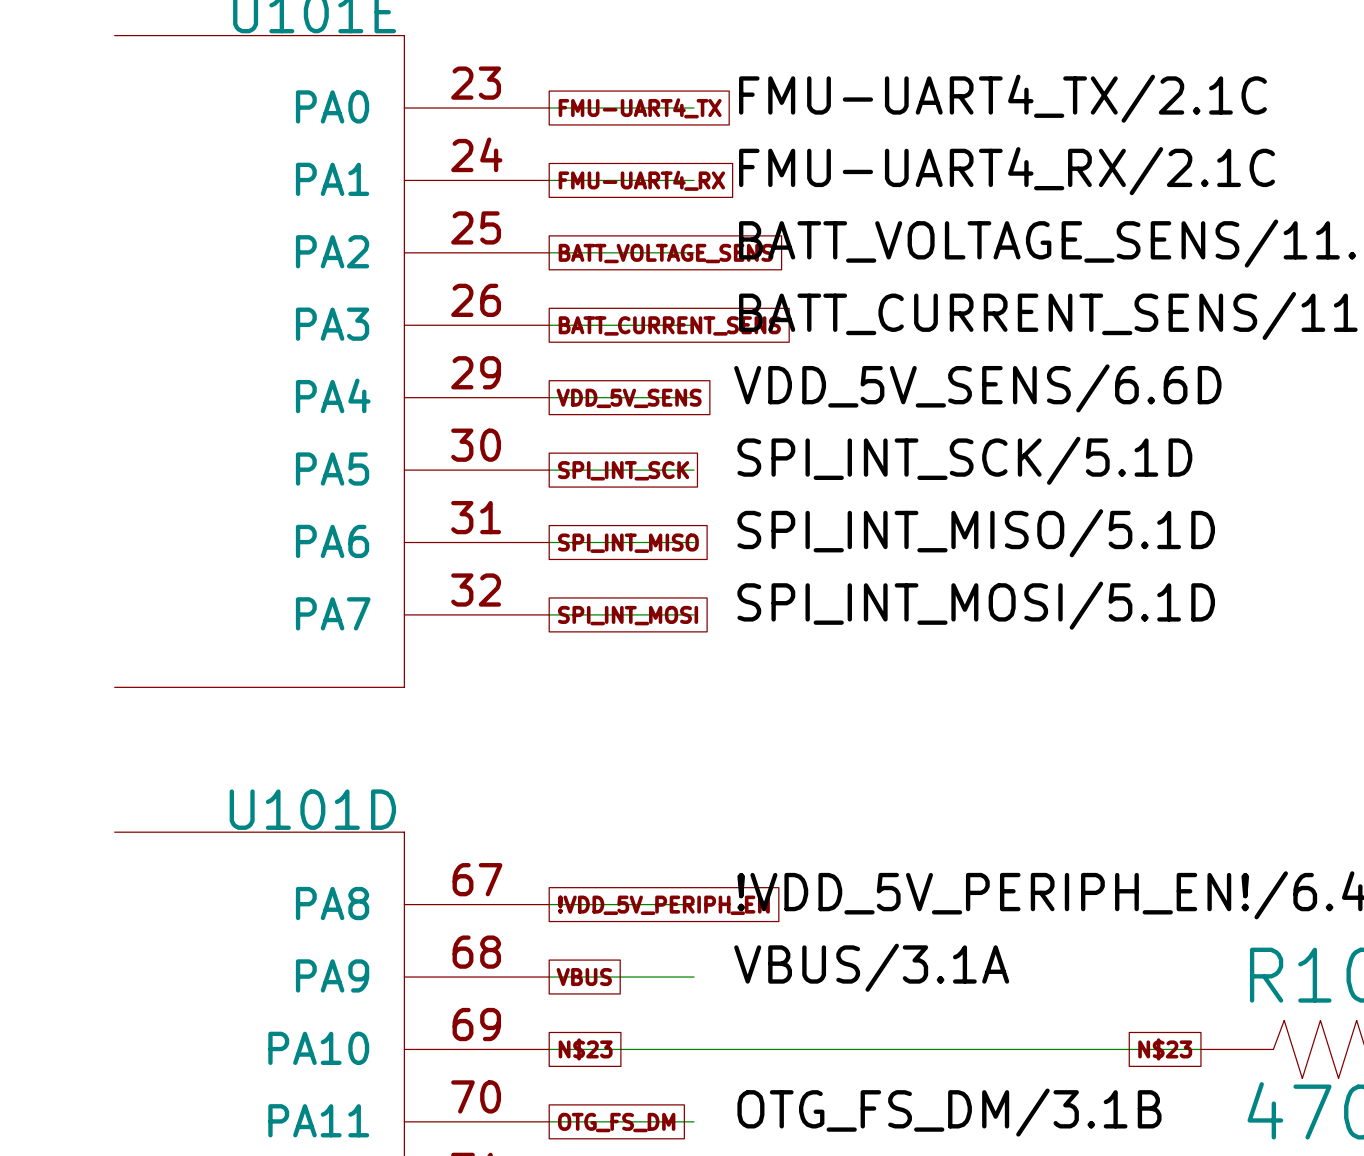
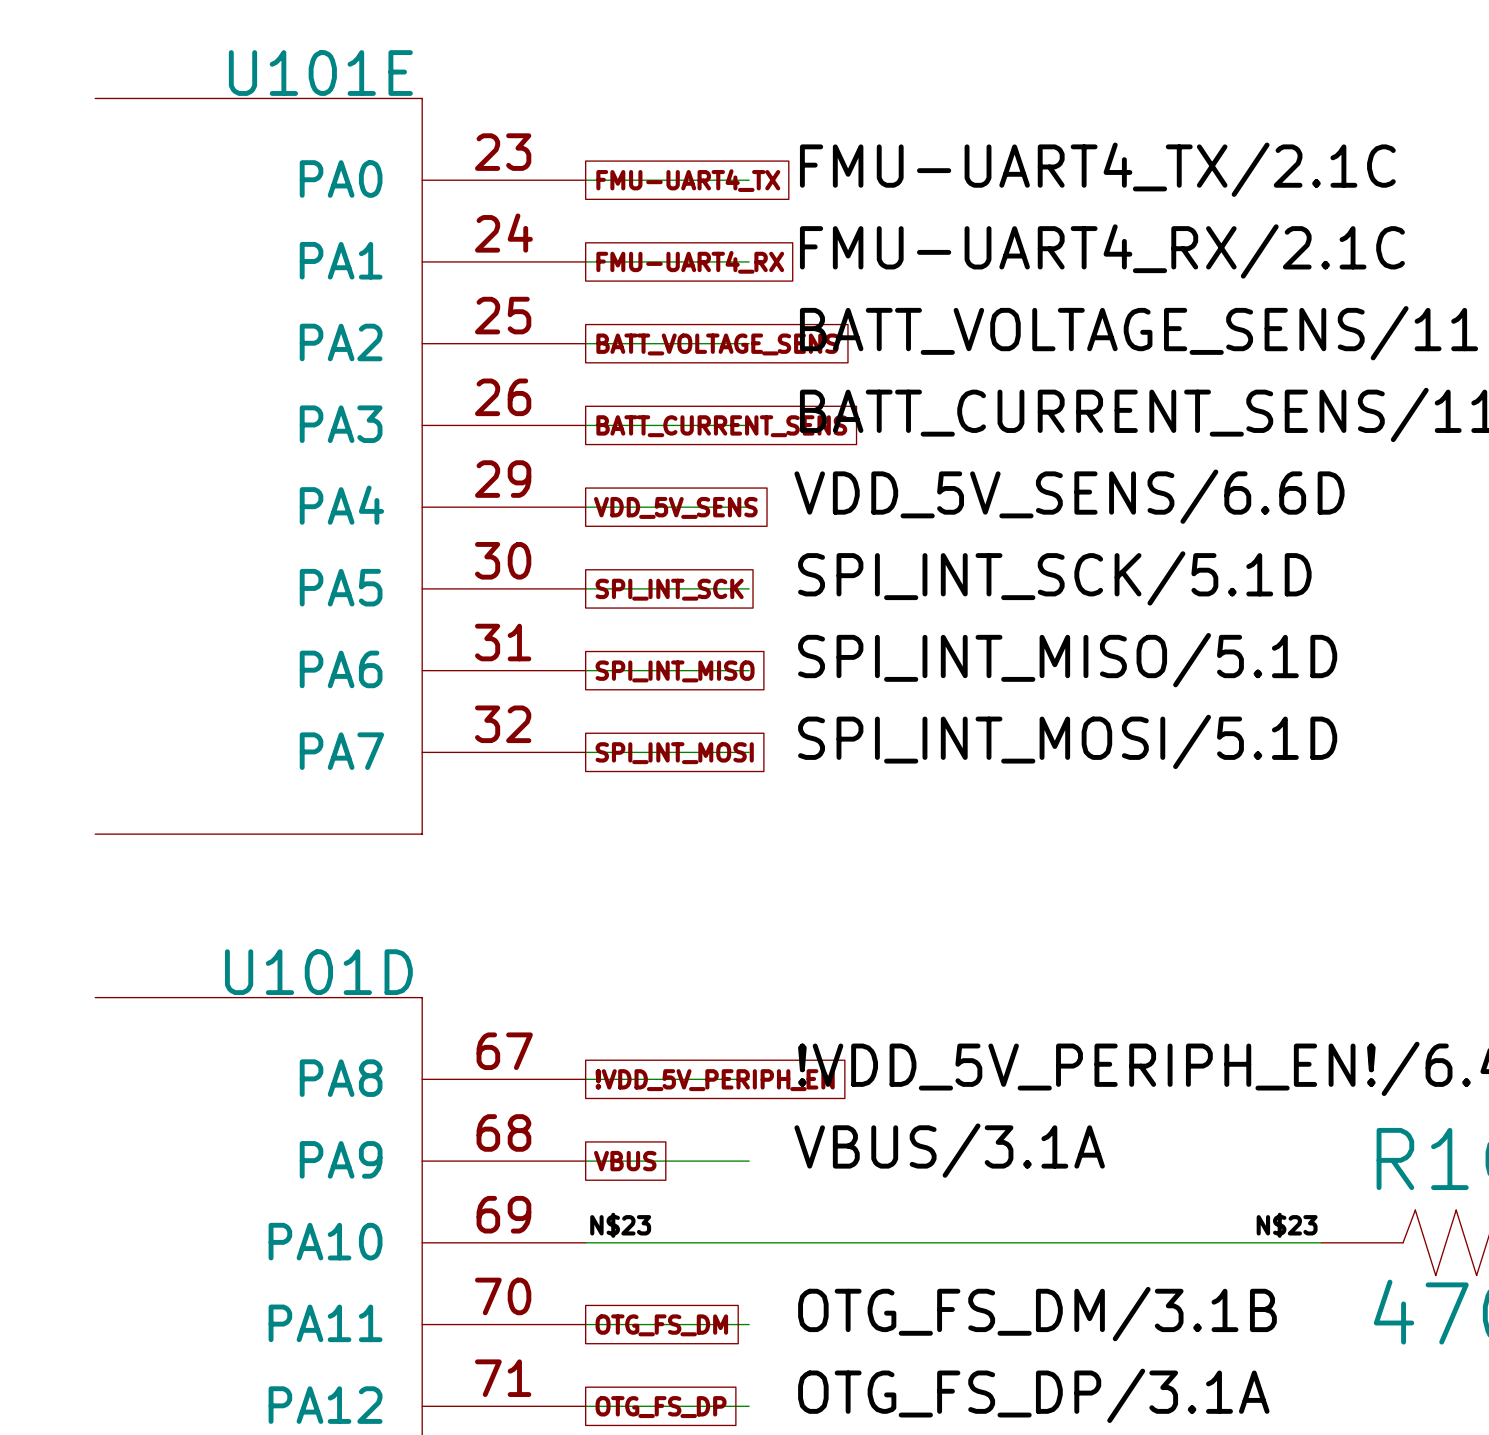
label: none -> N$23 (620, 1225)
label: none -> N$23 (1287, 1225)
global label: N$23 (585, 1049) -> none
global label: N$23 (1165, 1049) -> none

